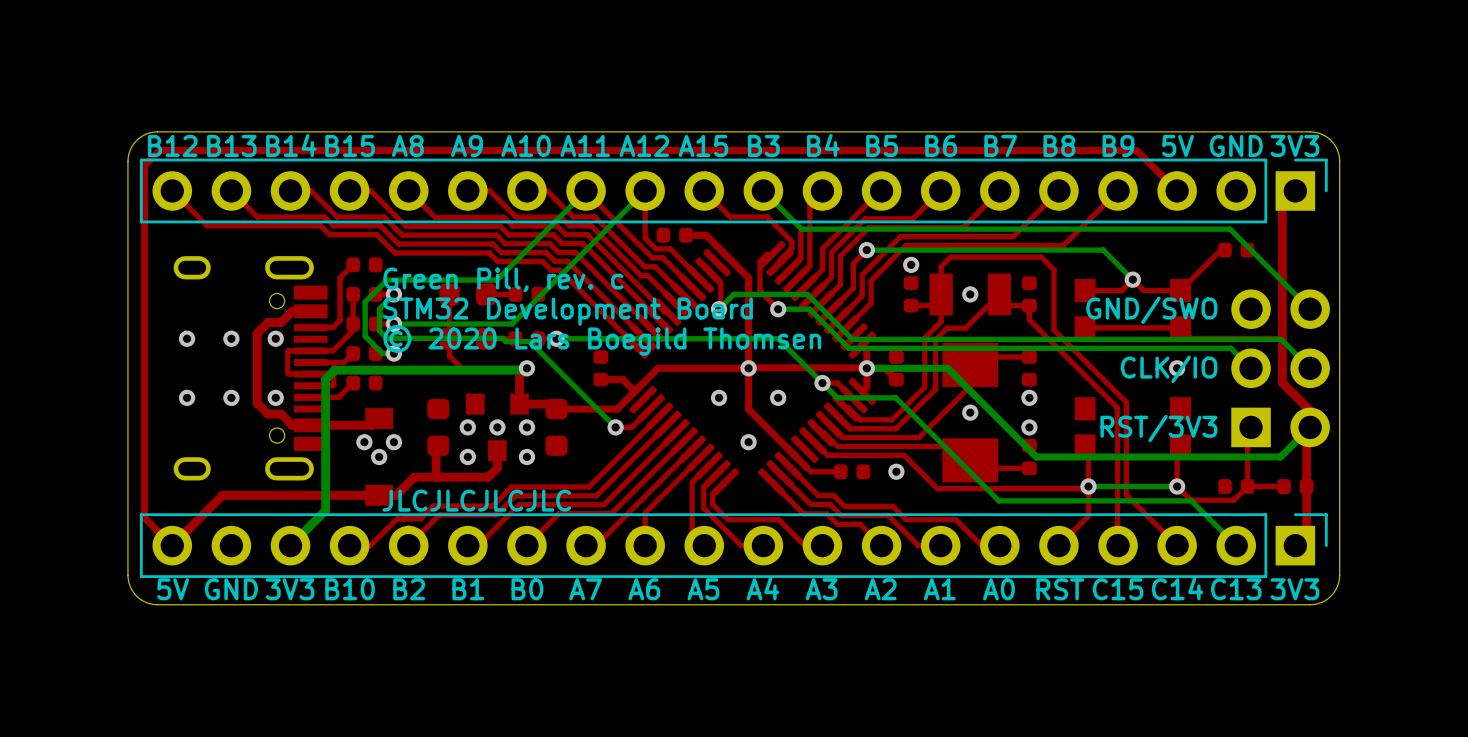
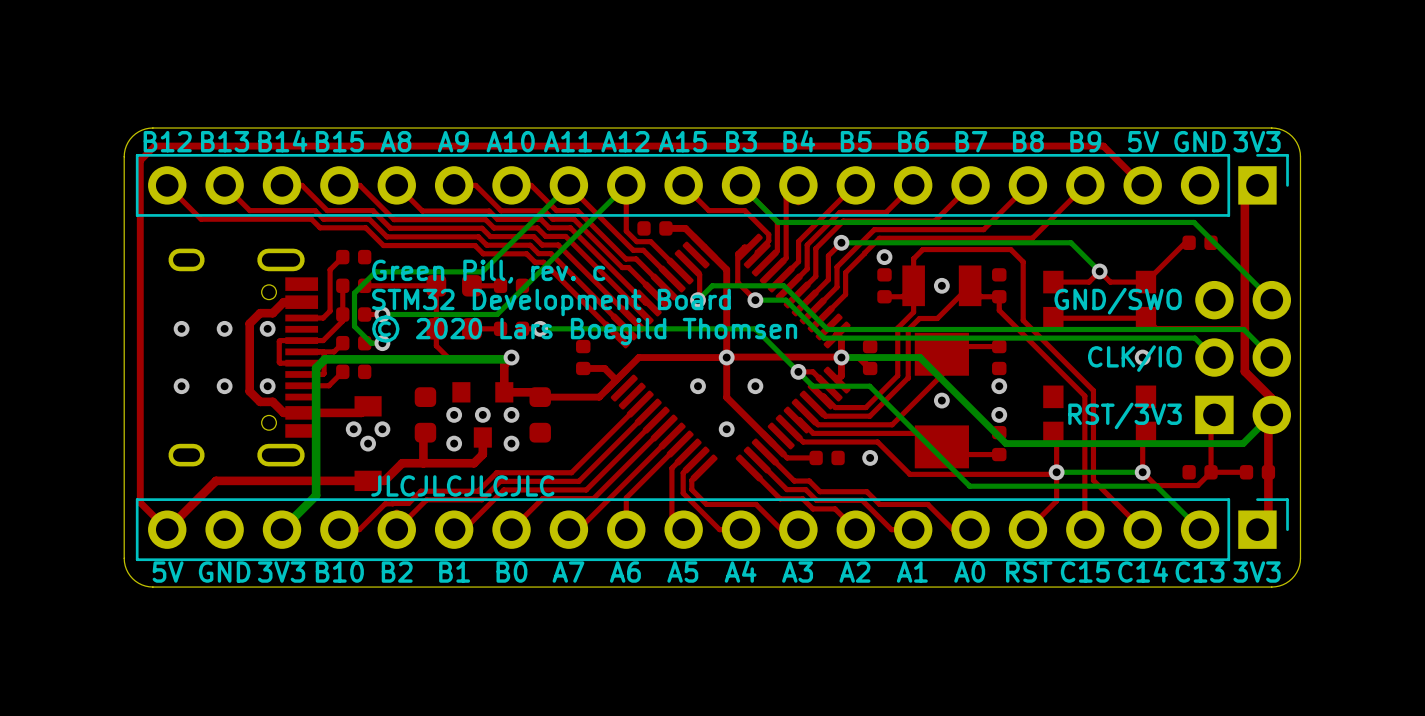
bottom track: (393, 294) (379, 308) (381, 315) (379, 317) (379, 330) (387, 338) (502, 338) (505, 341) (529, 341) (615, 427) -> none
via: (393, 294) -> none
top track: none -> (436, 285) (382, 285)
top track: (651, 408) (631, 427) (615, 427) -> none
via: (615, 427) -> none

